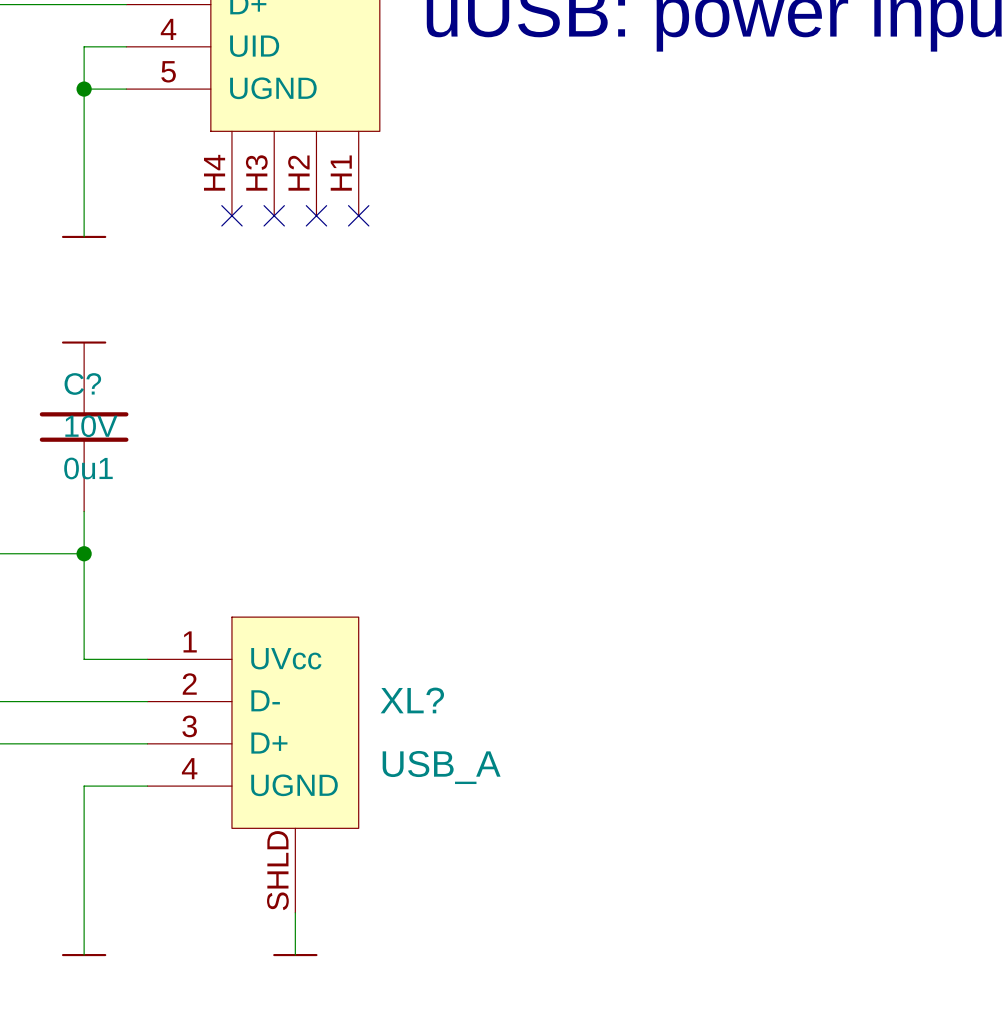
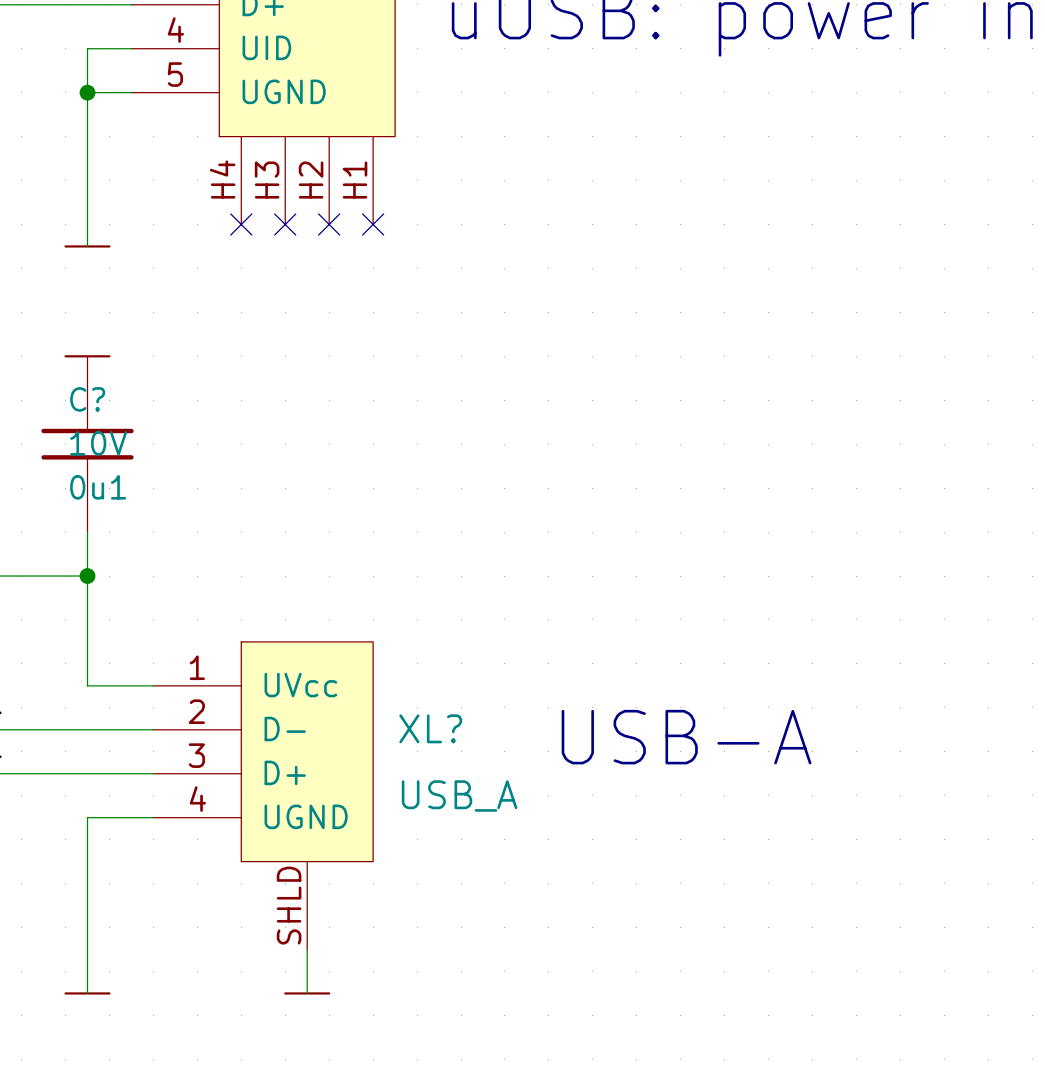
text: none -> USB-A (686, 737)

